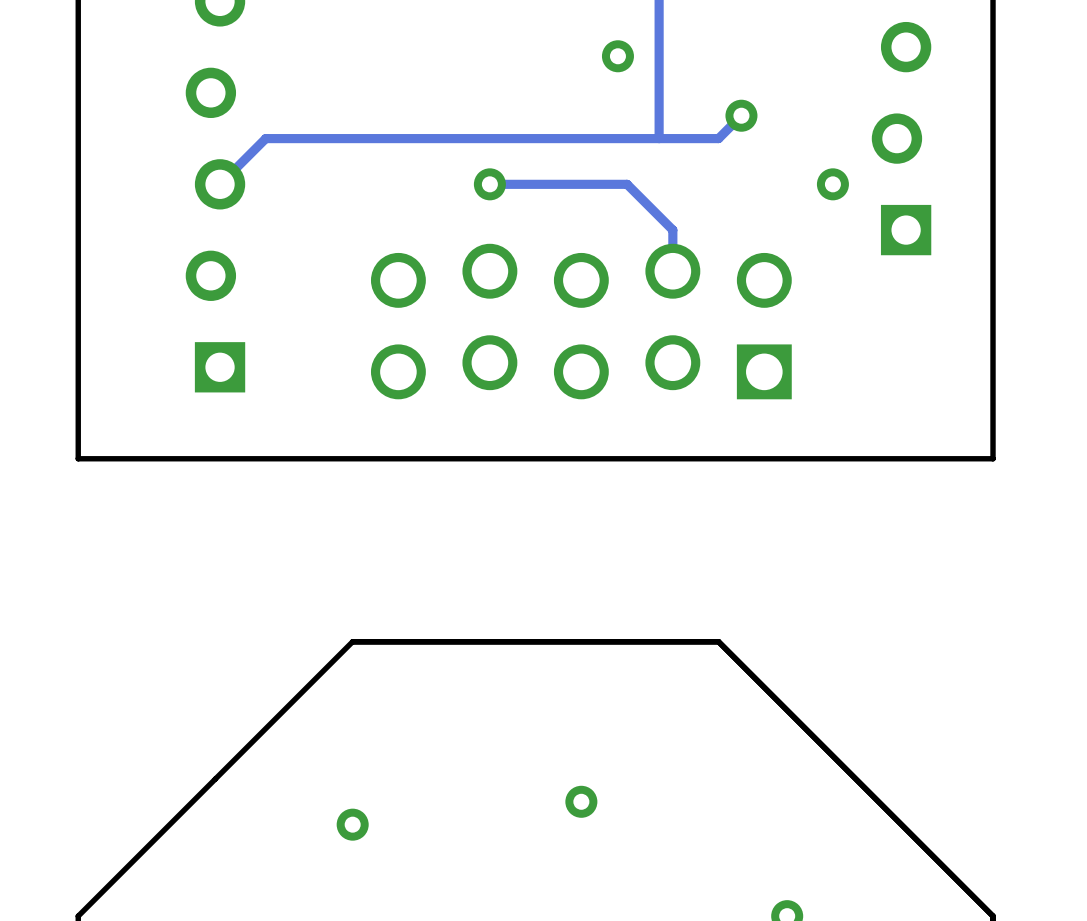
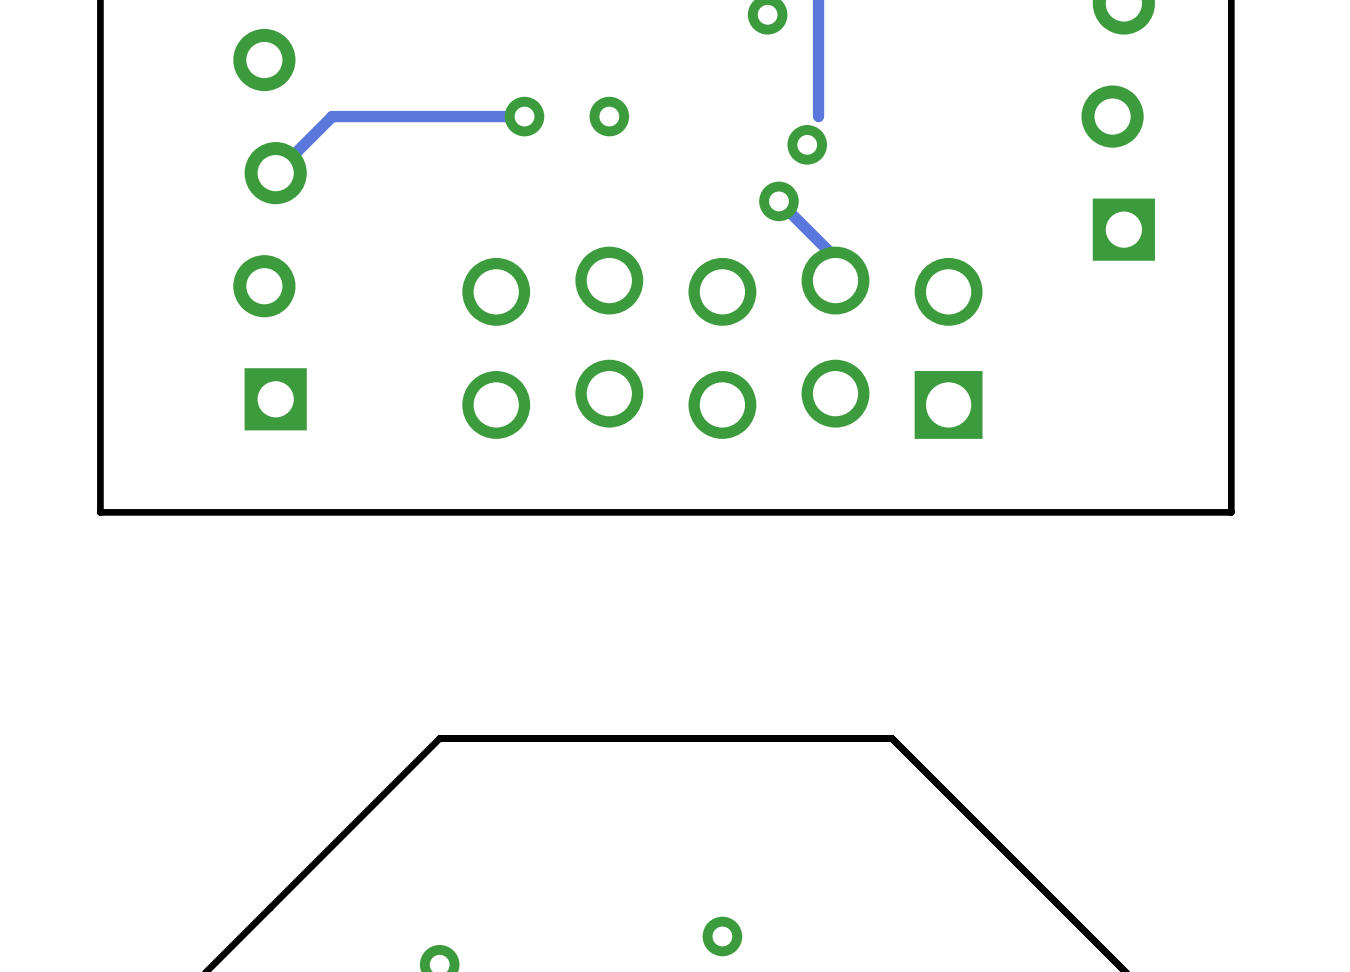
track: (741, 115) (718, 138) (421, 138) -> none
via: (741, 115) -> none
via: none -> (524, 116)
via: none -> (609, 116)
via: none -> (807, 144)
track: (489, 184) (627, 184) (672, 230) (672, 252) -> (778, 201) (835, 257)
via: (489, 184) -> none
via: (832, 184) -> none
via: none -> (778, 201)

